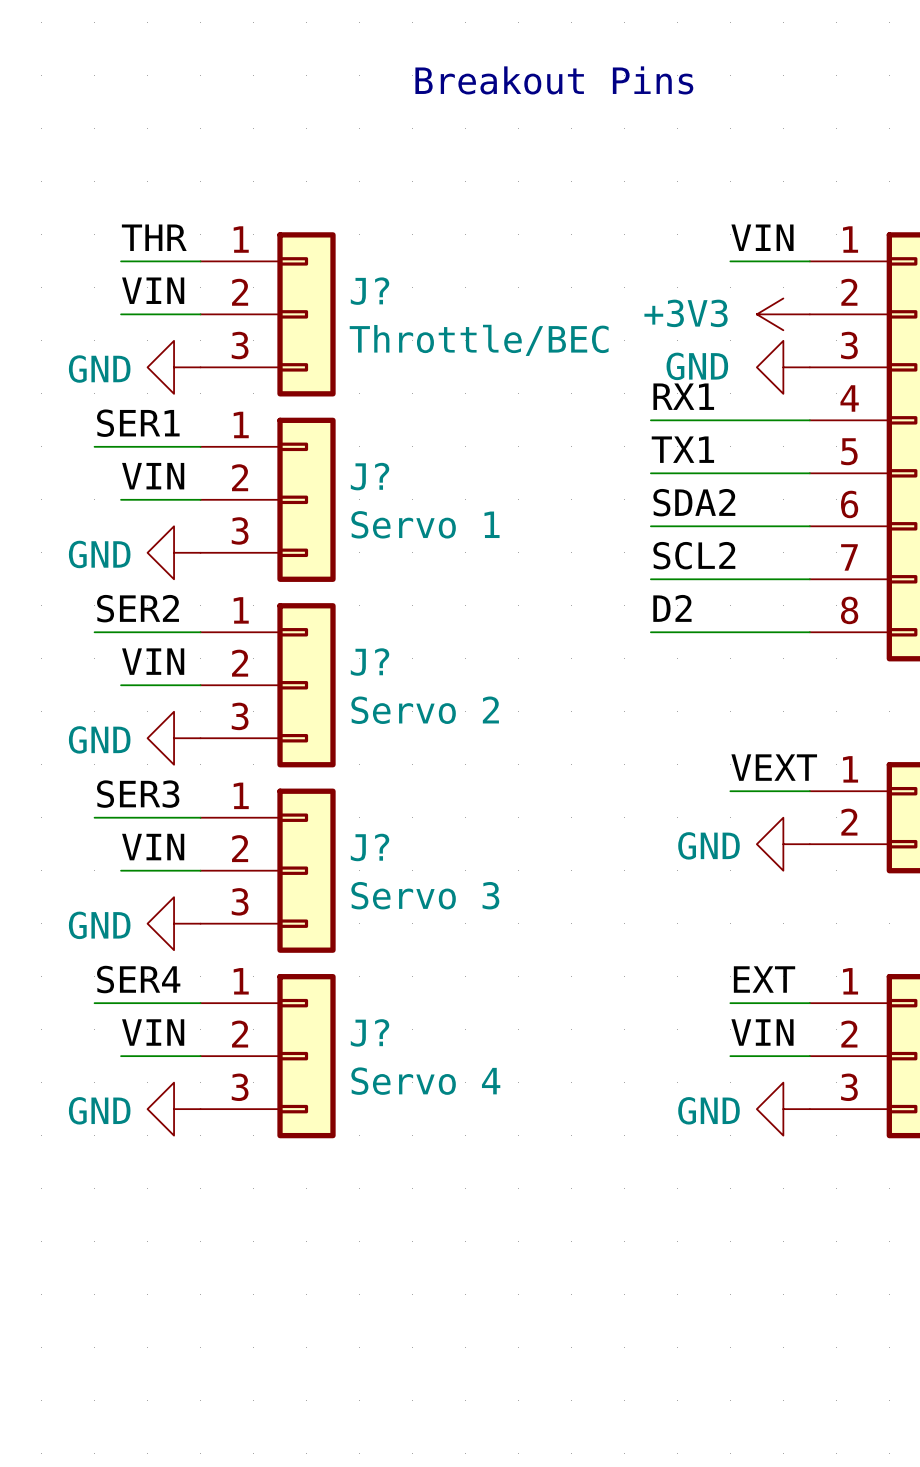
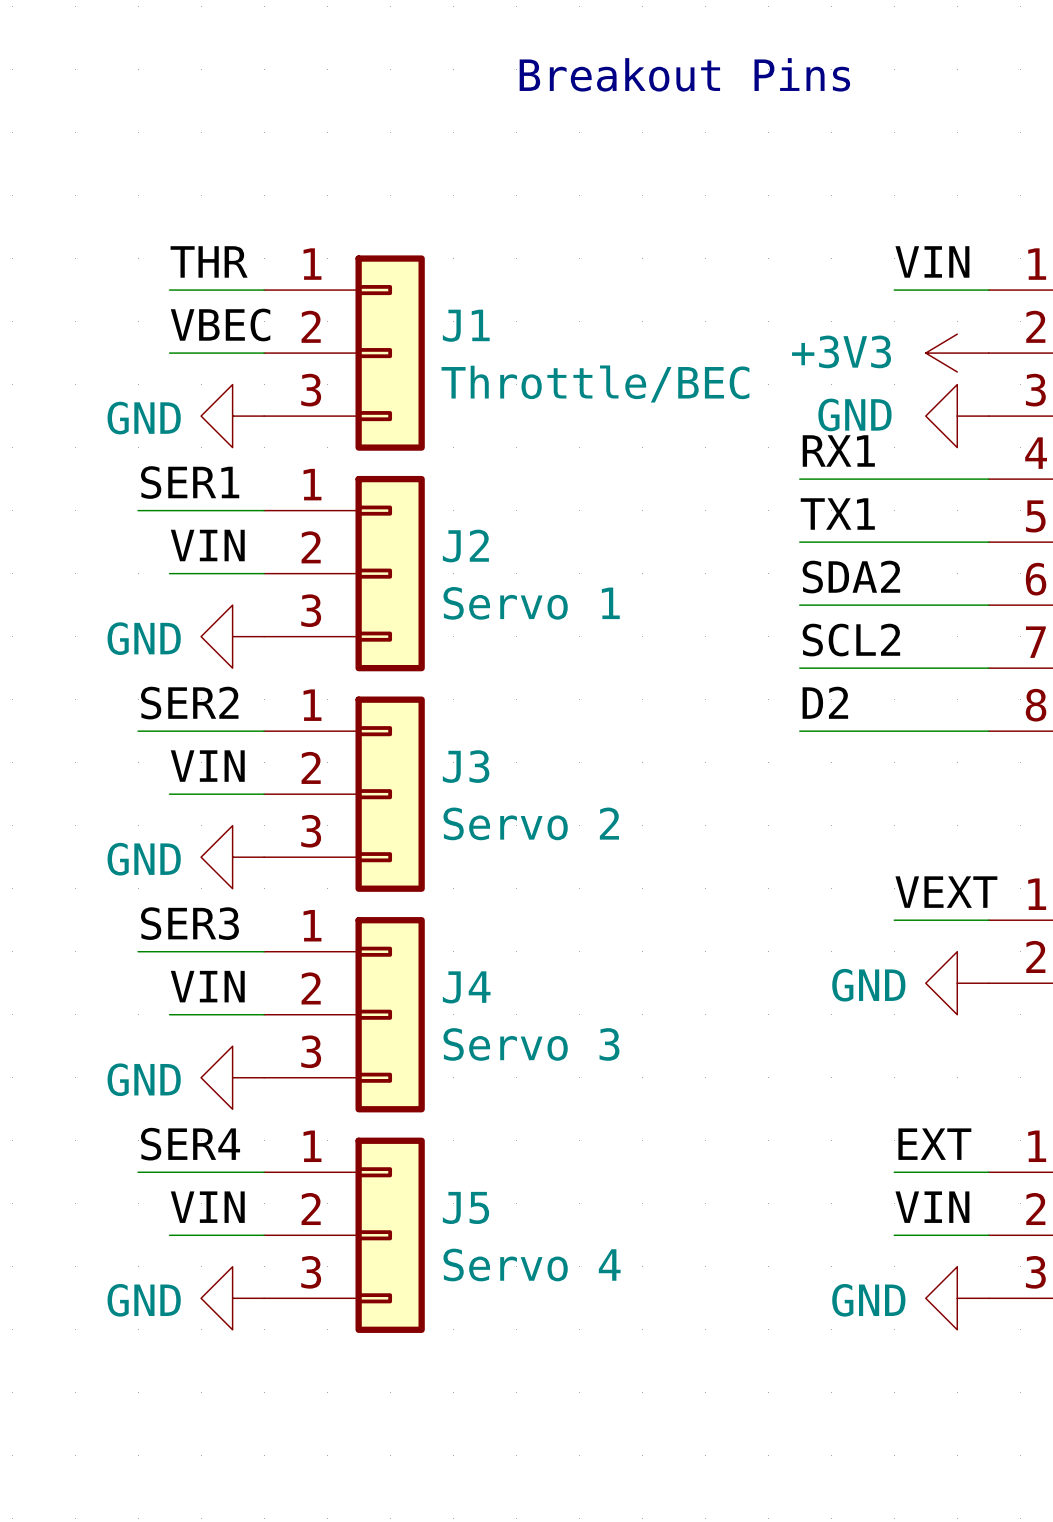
label: VIN (153, 290) -> VBEC (220, 324)
J? name: J? (370, 291) -> J1 (466, 325)
J? name: J? (370, 476) -> J2 (465, 546)
J? name: J? (370, 662) -> J3 (466, 766)
J? name: J? (370, 847) -> J4 (466, 987)
J? name: J? (370, 1032) -> J5 (465, 1207)

